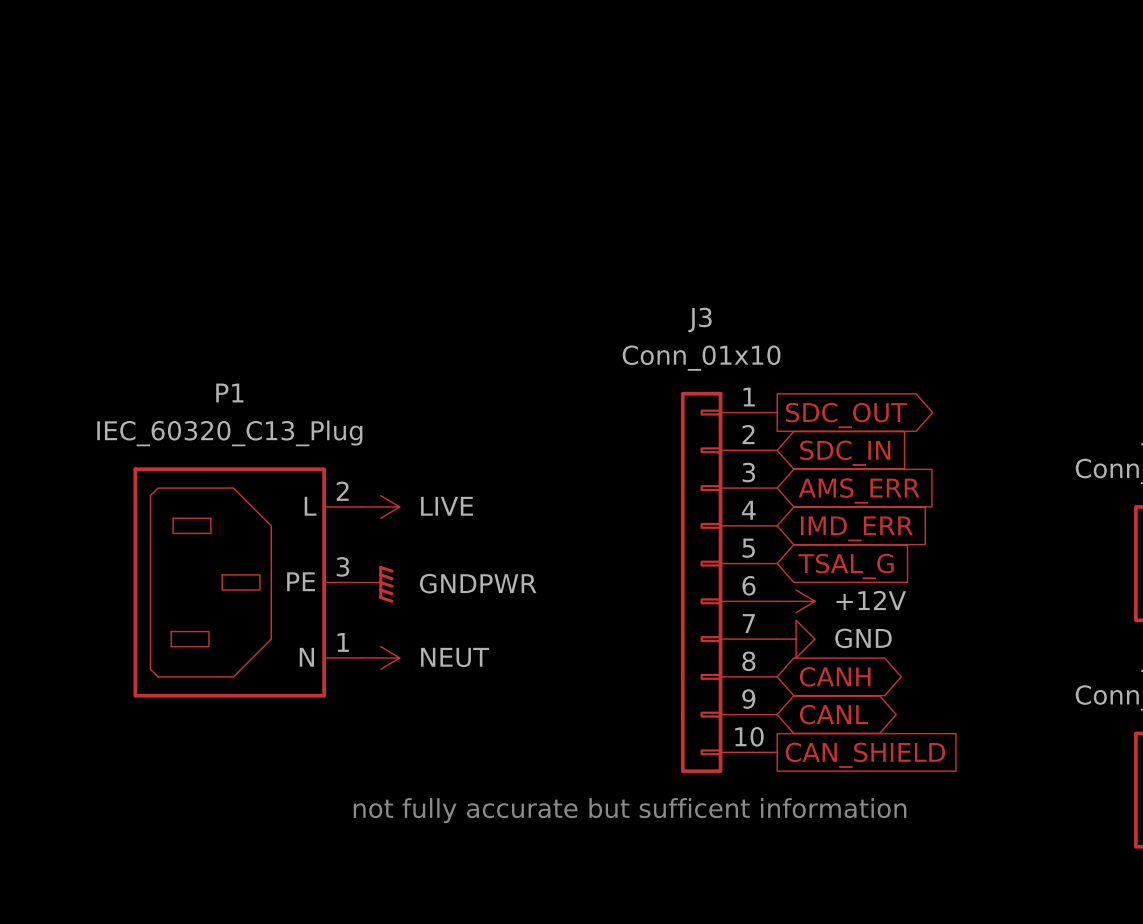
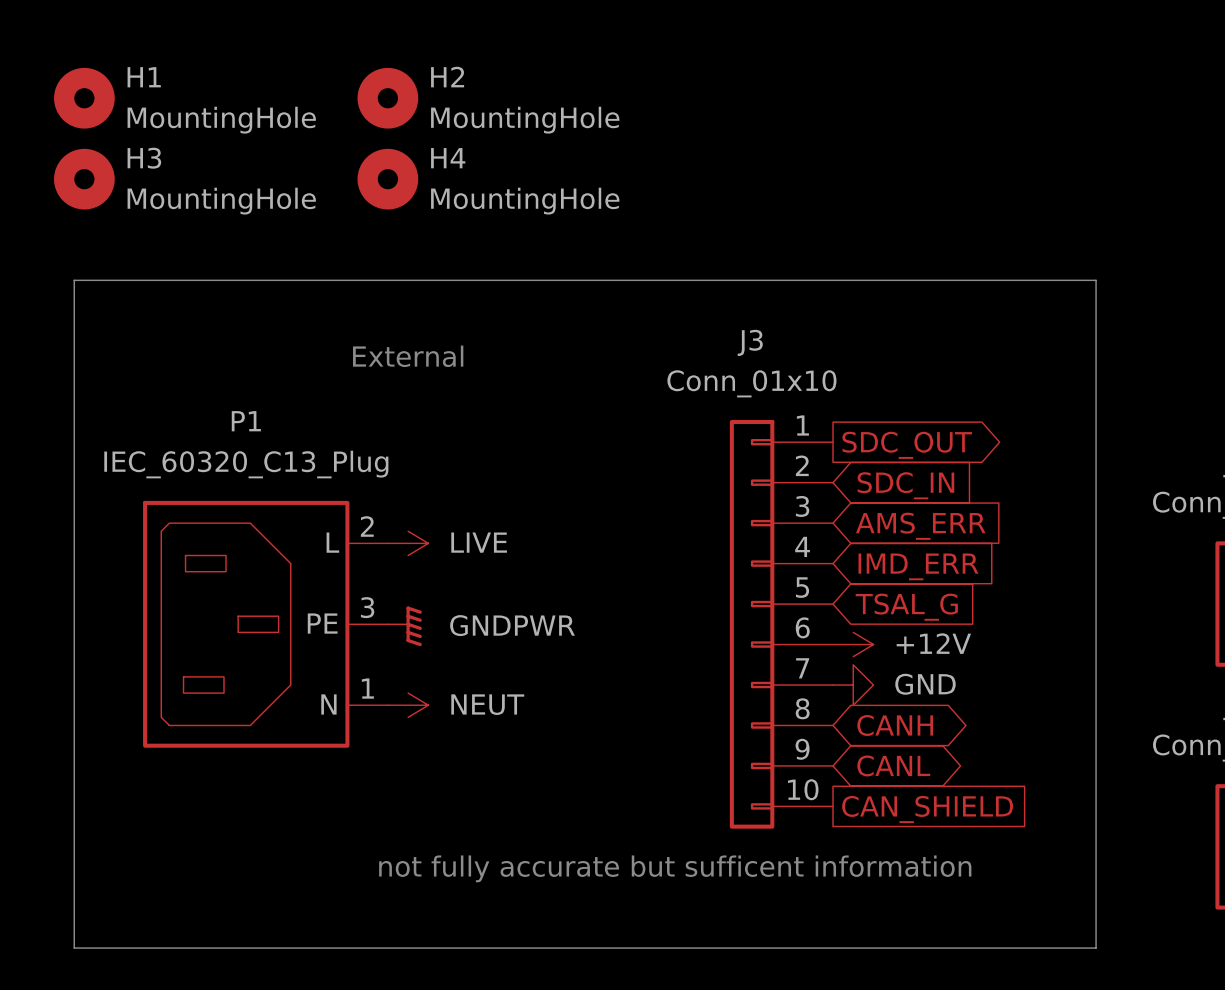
H1: none -> MountingHole (84, 98)
H2: none -> MountingHole (387, 98)
H3: none -> MountingHole (84, 179)
H4: none -> MountingHole (387, 179)
line: none -> (74, 280) (1096, 280) (1096, 948) (74, 948) (74, 280)
text: none -> External (408, 356)

